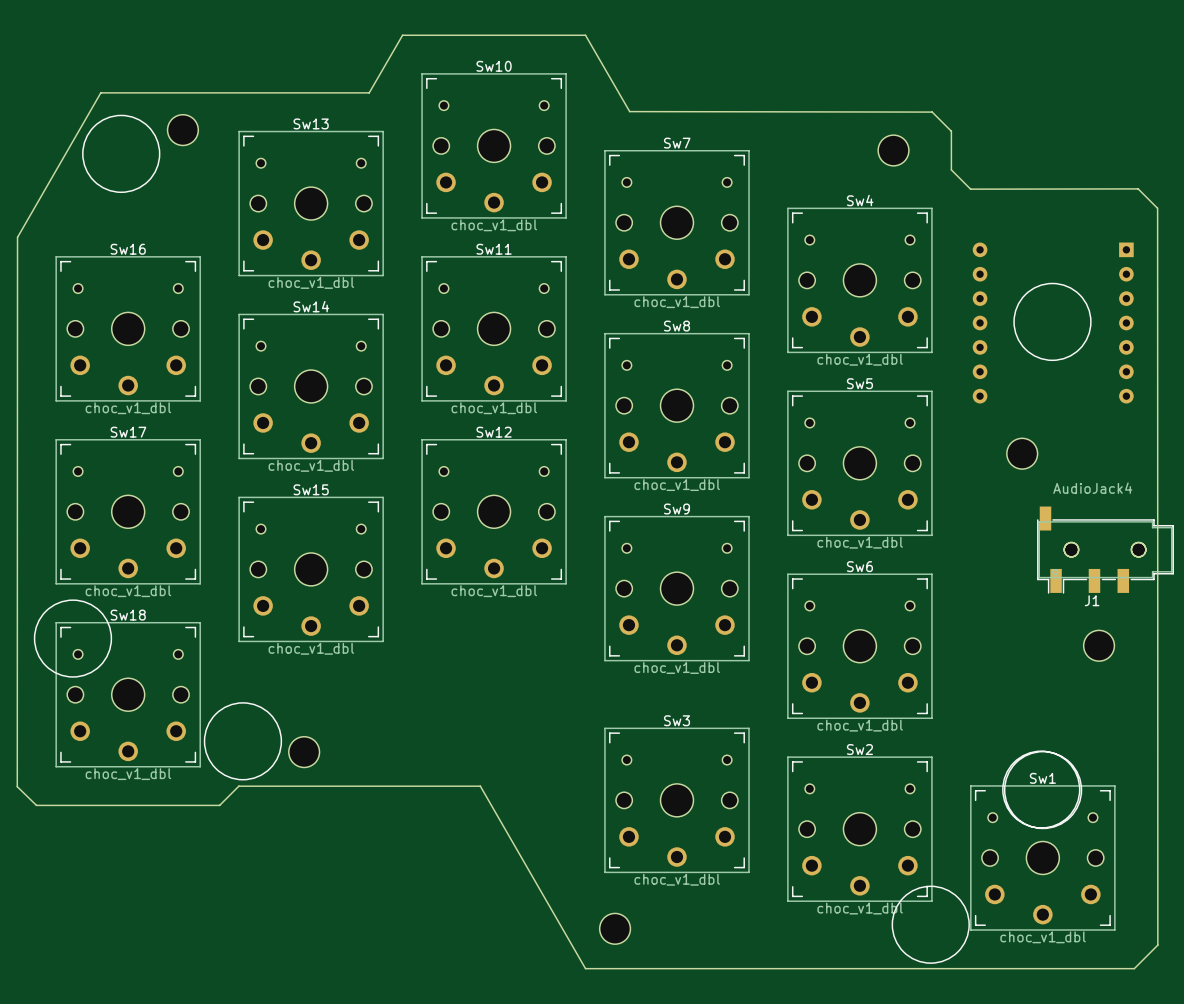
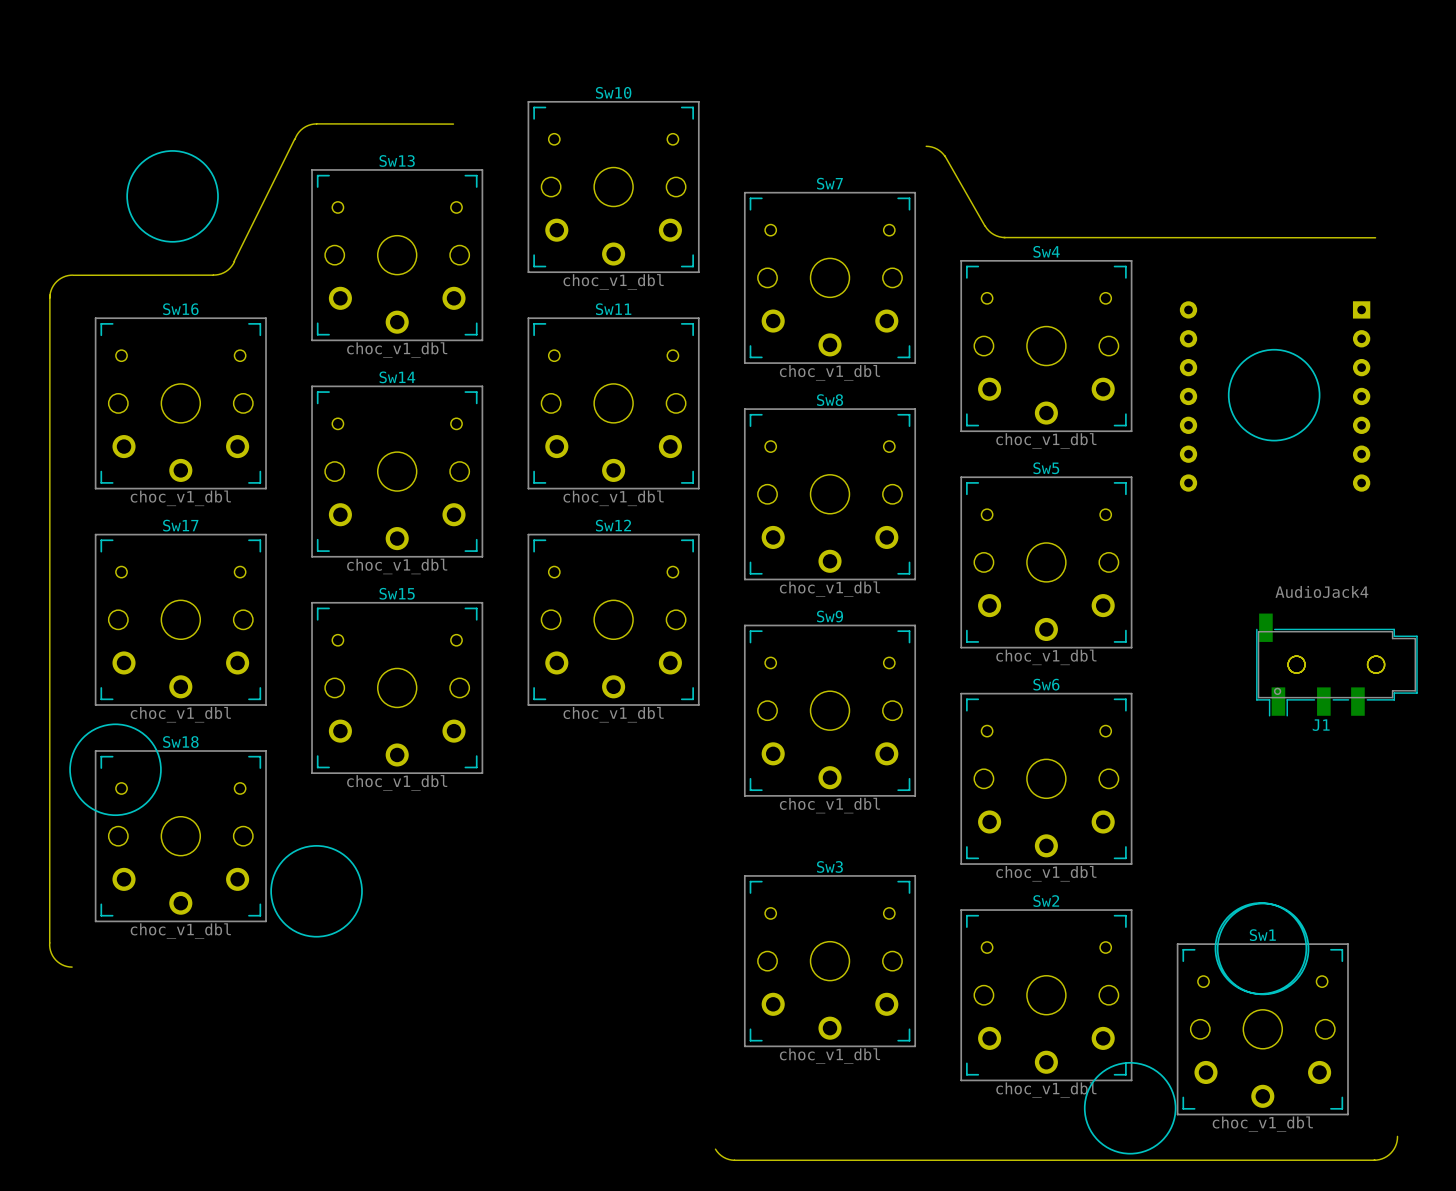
board edge: none -> (453, 124) (313, 124) (303, 128) (294, 139)
board edge: none -> (294, 139) (234, 261)
board edge: none -> (926, 146) (937, 149) (945, 156)
board edge: none -> (944, 155) (984, 225)
part: (182, 130) -> none
part: (893, 150) -> none
board edge: none -> (985, 226) (993, 234) (1005, 237)
board edge: none -> (1003, 237) (1375, 237)
board edge: none -> (234, 261) (226, 271) (213, 275)
board edge: (1157, 208) (1157, 945) (1134, 968) -> (1374, 1160) (1370, 1160)
board edge: (1157, 208) (1138, 188) (970, 189) (951, 169) (951, 131) (932, 112) (629, 111) (585, 35) (402, 35) (369, 92) (100, 92) (17, 237) (17, 786) (36, 805) (219, 805) (238, 786) (480, 786) (585, 968) (596, 968) -> (715, 1149) (723, 1157) (734, 1160)
board edge: none -> (73, 275) (65, 276) (56, 281) (51, 290) (49, 297)
board edge: none -> (213, 275) (74, 275)
board edge: none -> (49, 295) (49, 945) (55, 959) (61, 964) (72, 967)
part: (1022, 453) -> none
part: (1099, 645) -> none
part: (304, 752) -> none
part: (615, 928) -> none
board edge: none -> (1397, 1136) (1396, 1144) (1390, 1153) (1381, 1158) (1374, 1160)

